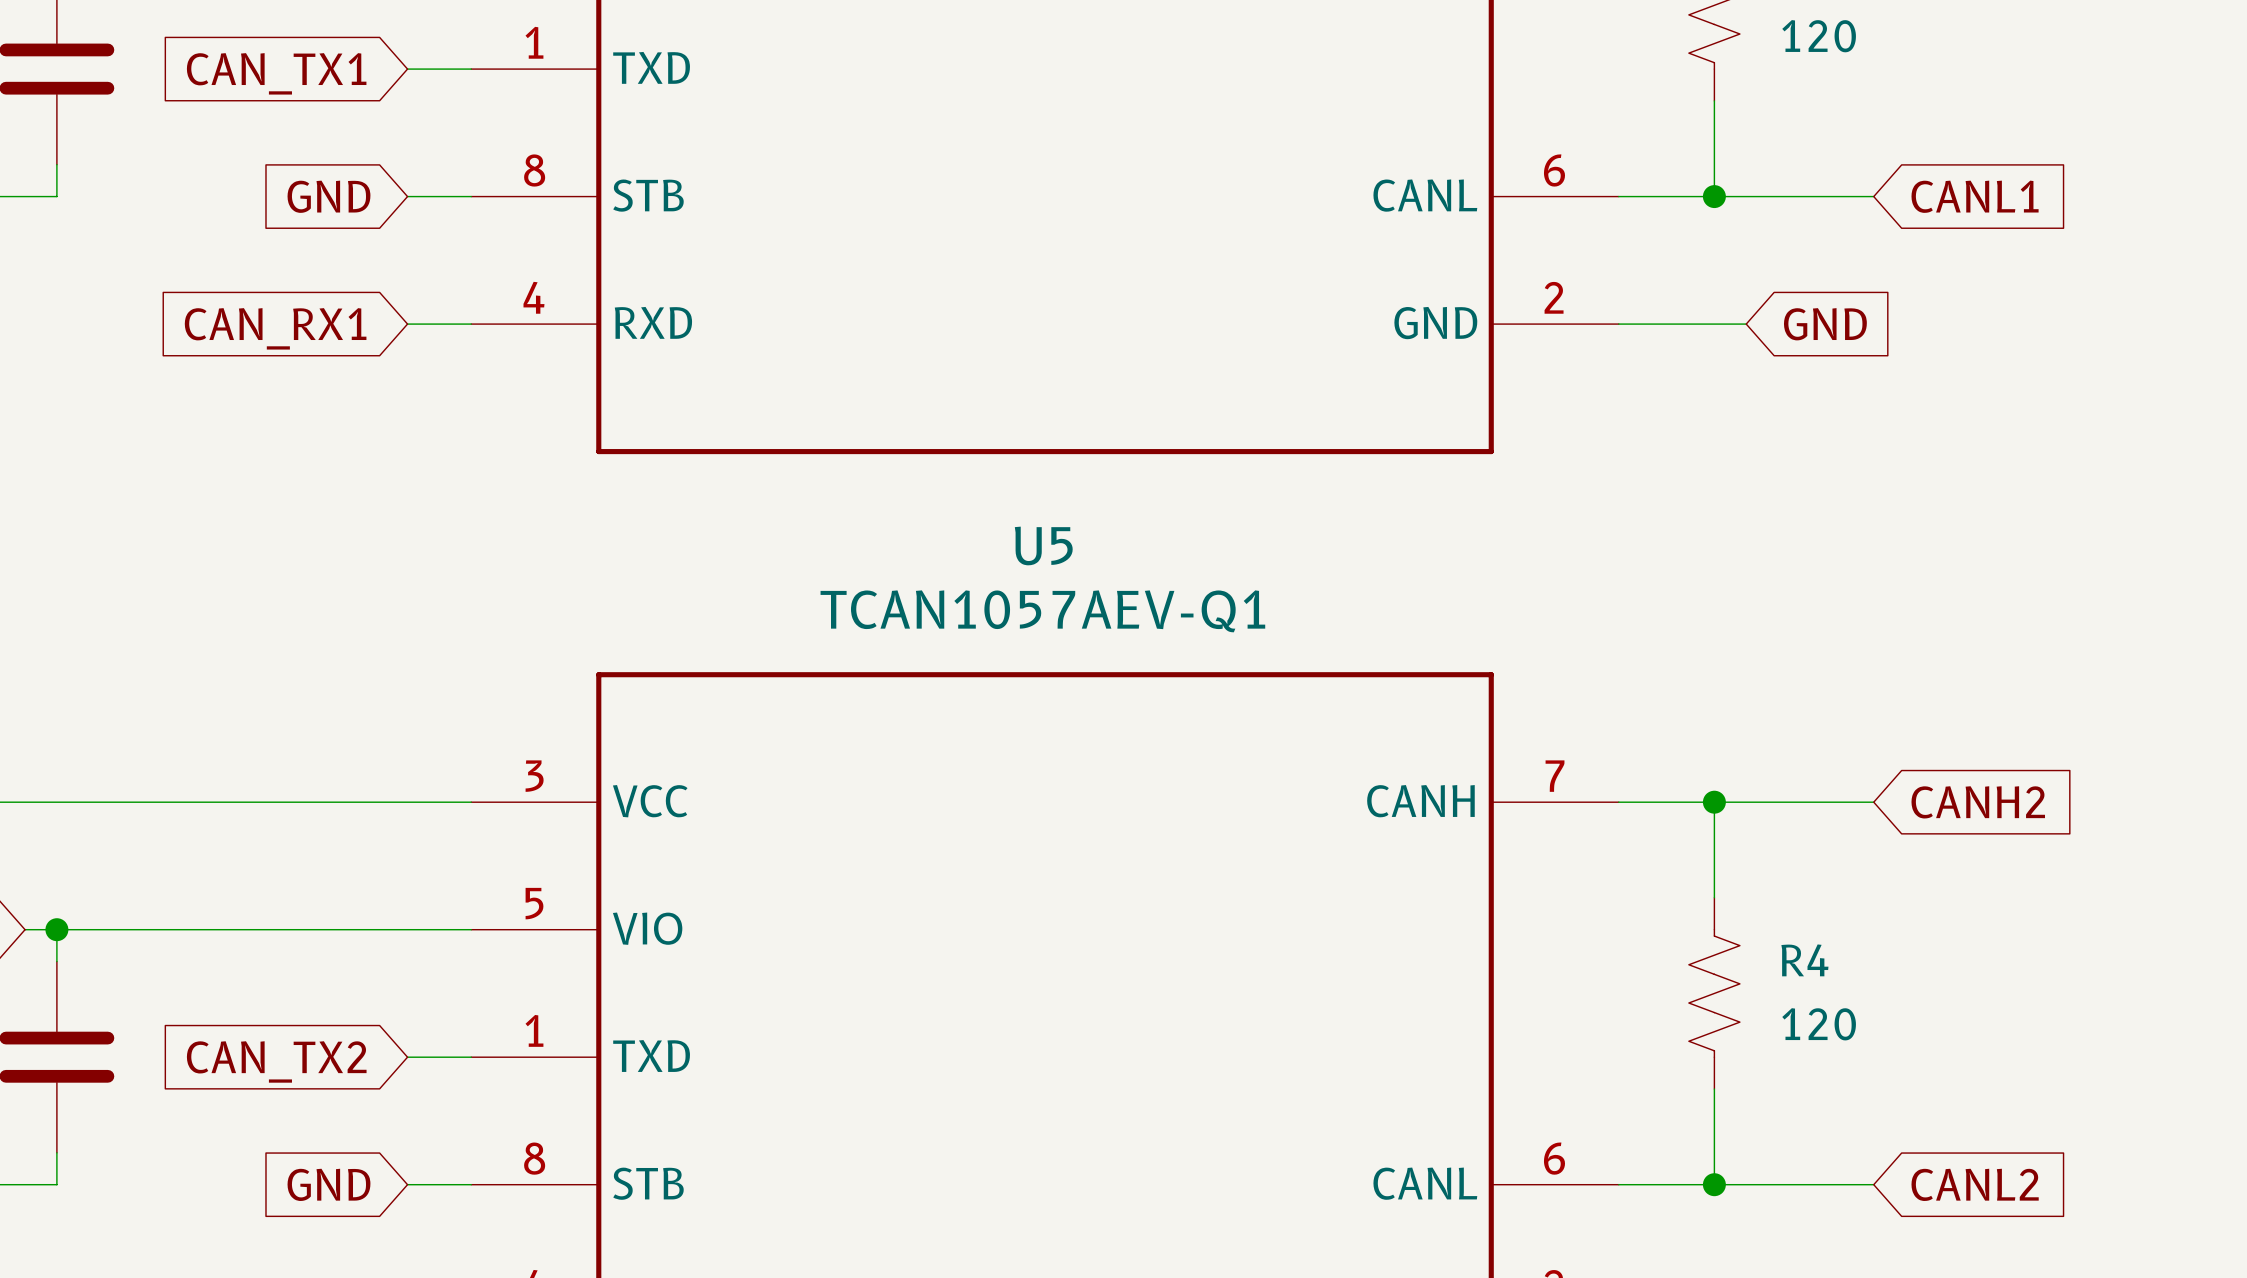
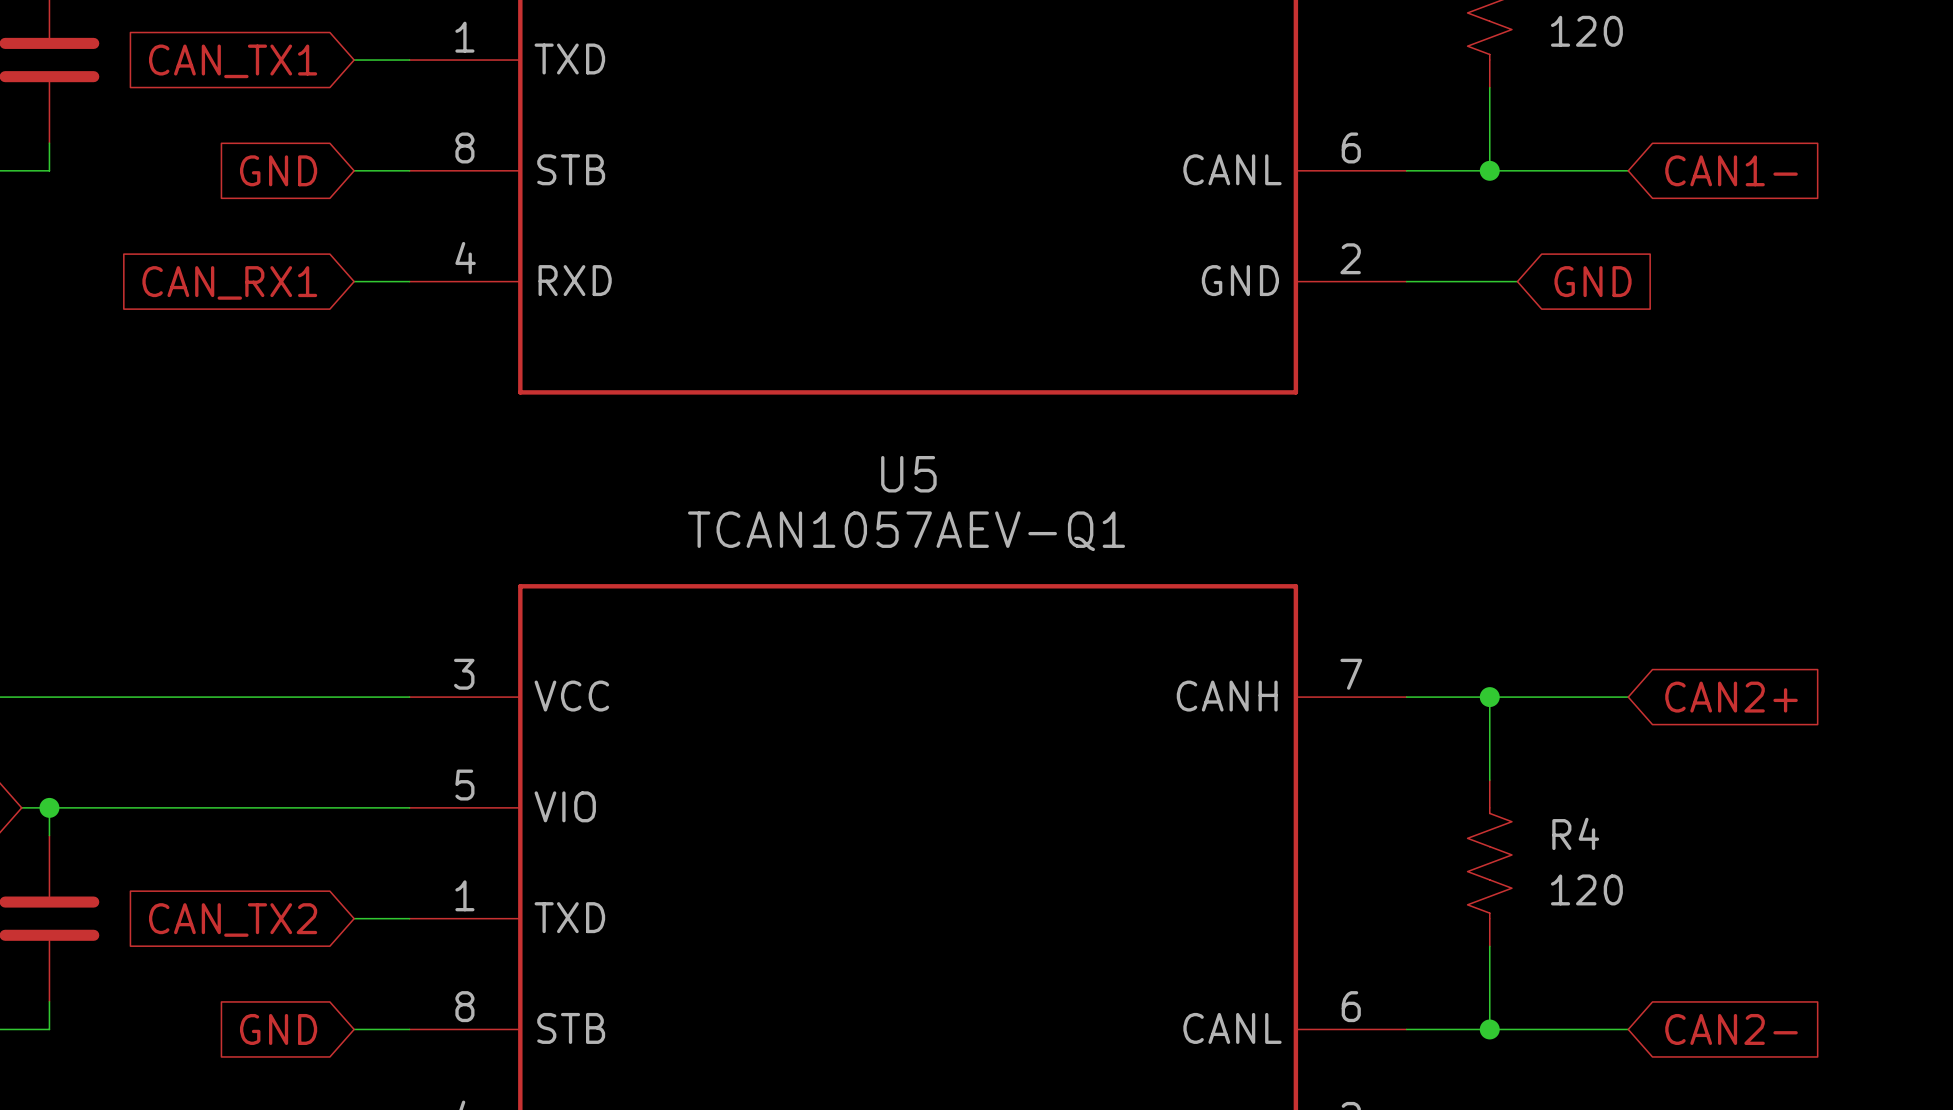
global label: CANL1 (1975, 196) -> CAN1- (1731, 170)
global label: CANH2 (1978, 802) -> CAN2+ (1731, 697)
global label: CANL2 (1975, 1184) -> CAN2- (1731, 1029)

